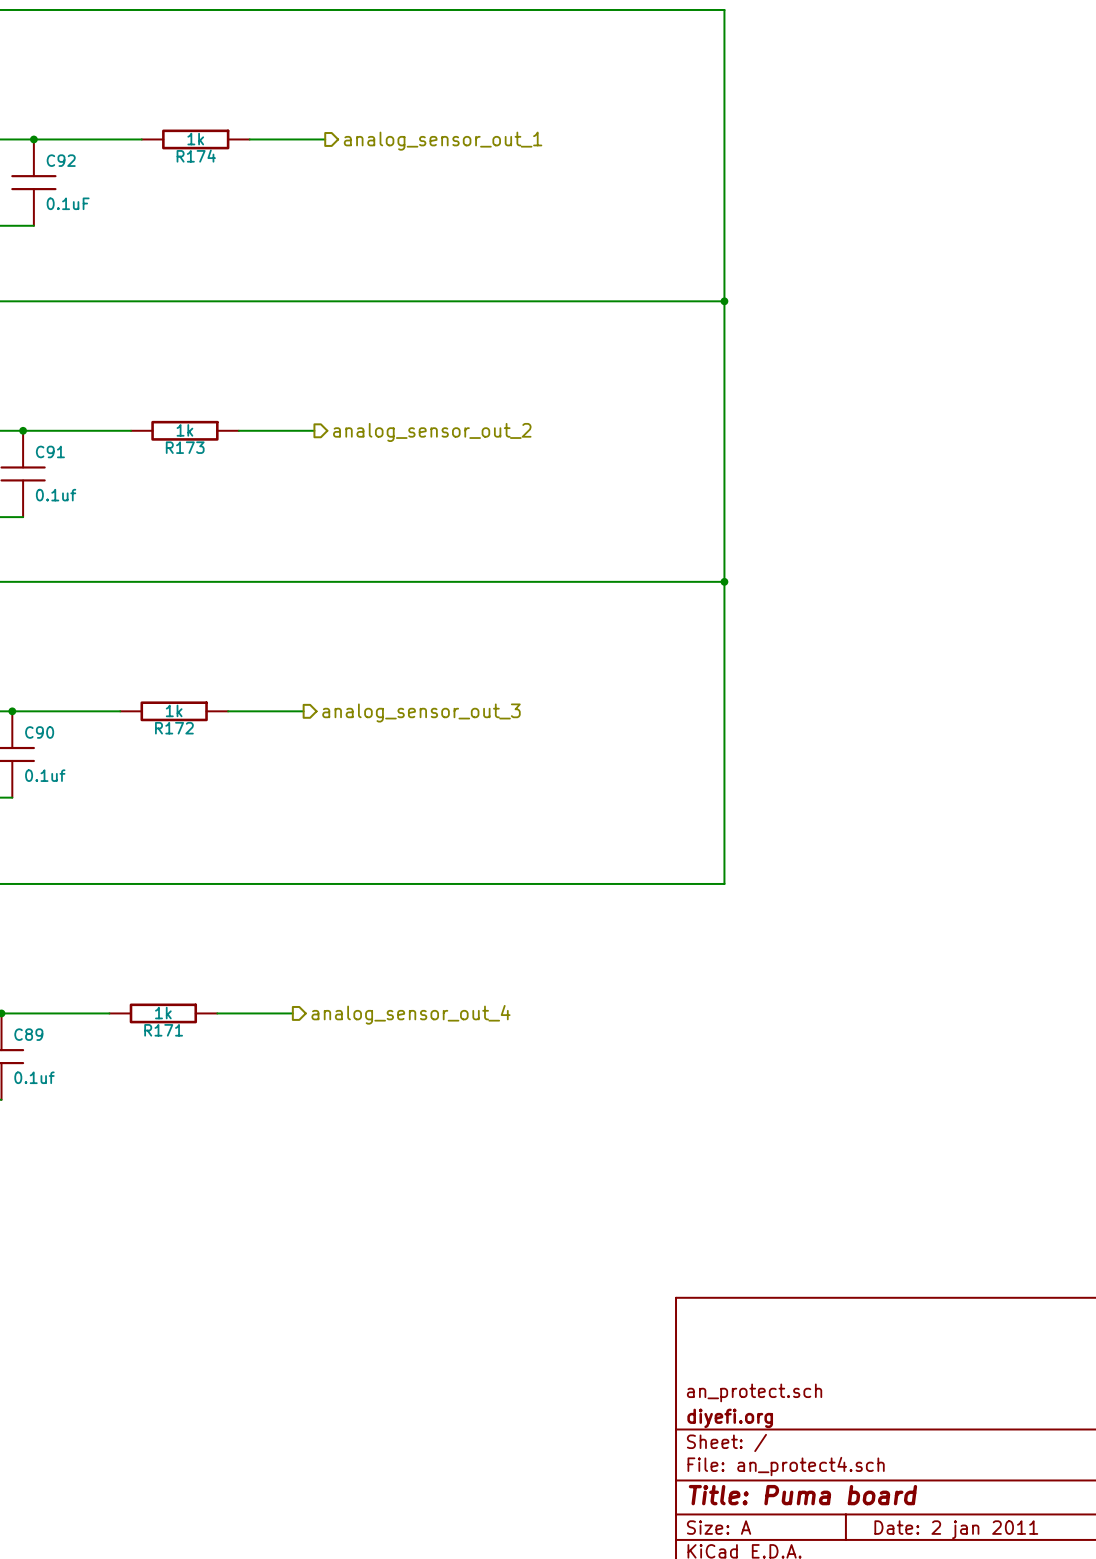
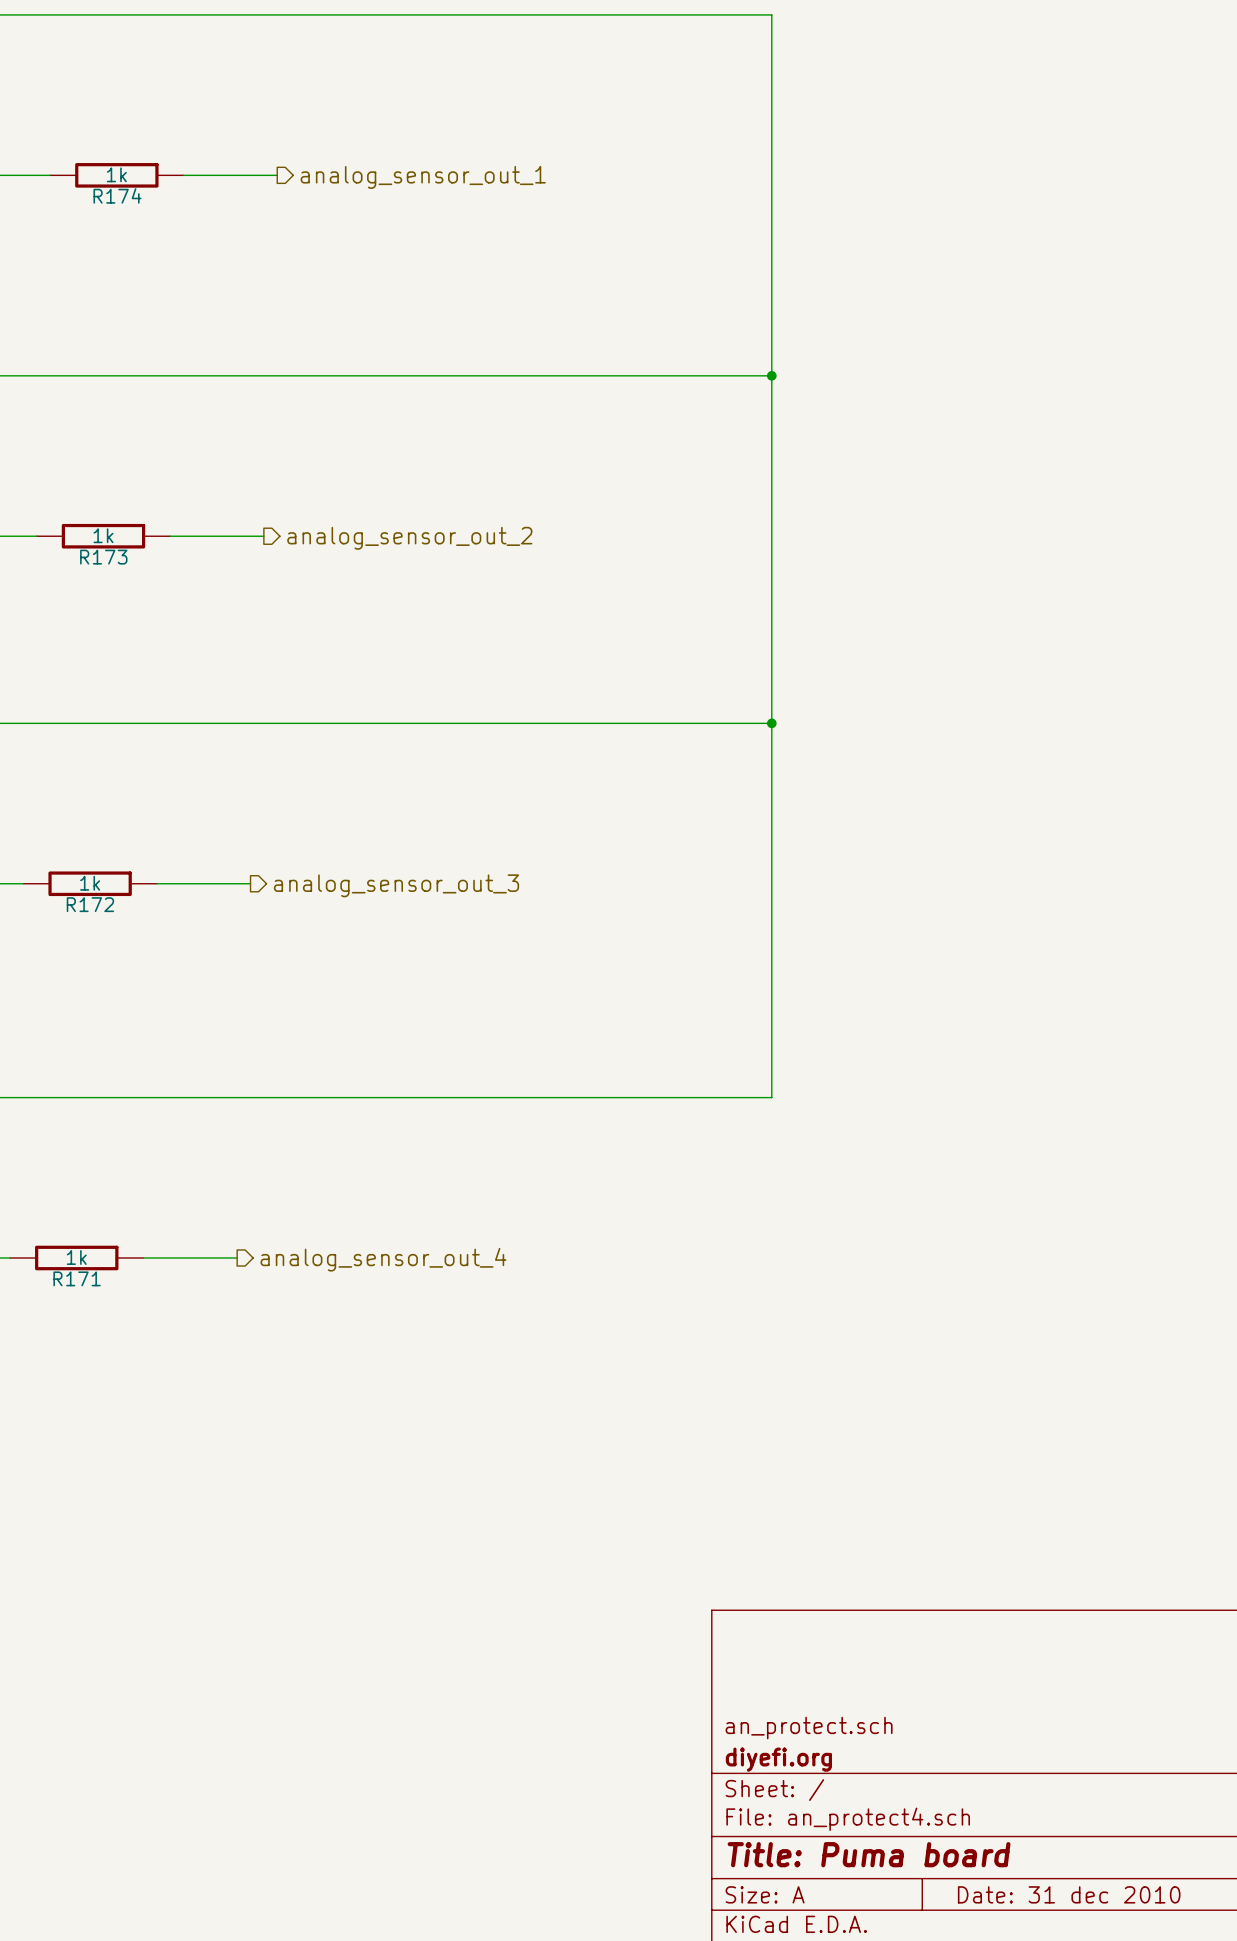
title block: Date: 2 jan 2011 (956, 1529) -> Date: 31 dec 2010 (1069, 1894)

